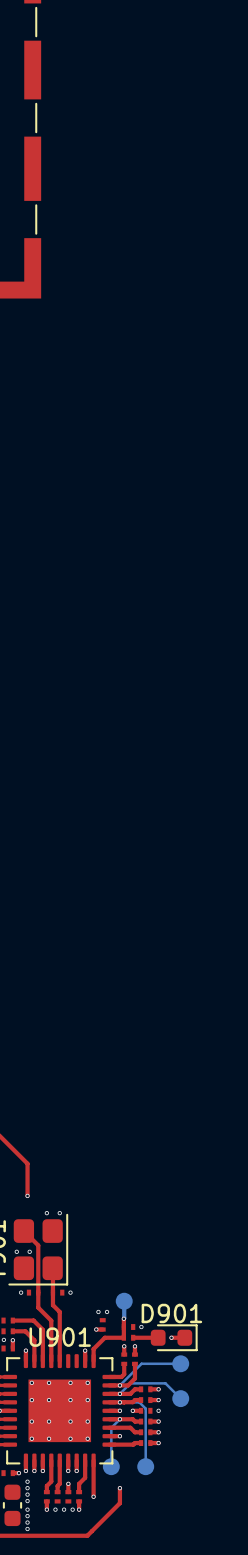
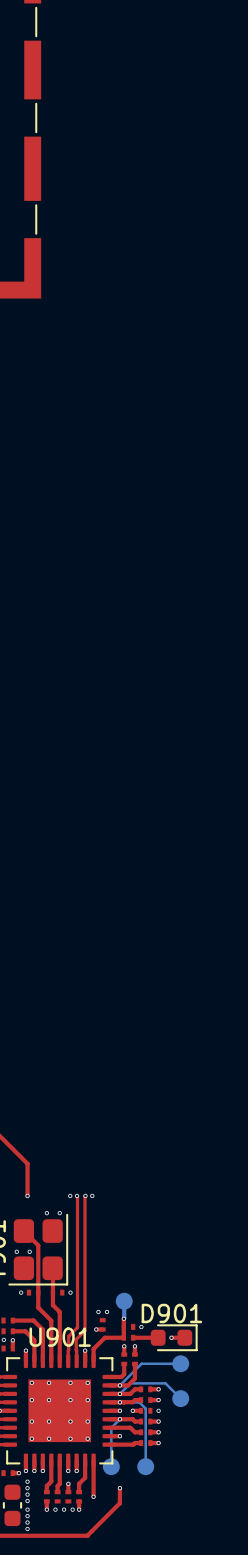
via: none -> (70, 1195)
top track: none -> (77, 1195) (77, 1327) (68, 1336) (68, 1361)
via: none -> (77, 1195)
top track: none -> (85, 1195) (84, 1330) (76, 1339) (76, 1361)
via: none -> (85, 1195)
via: none -> (92, 1195)

